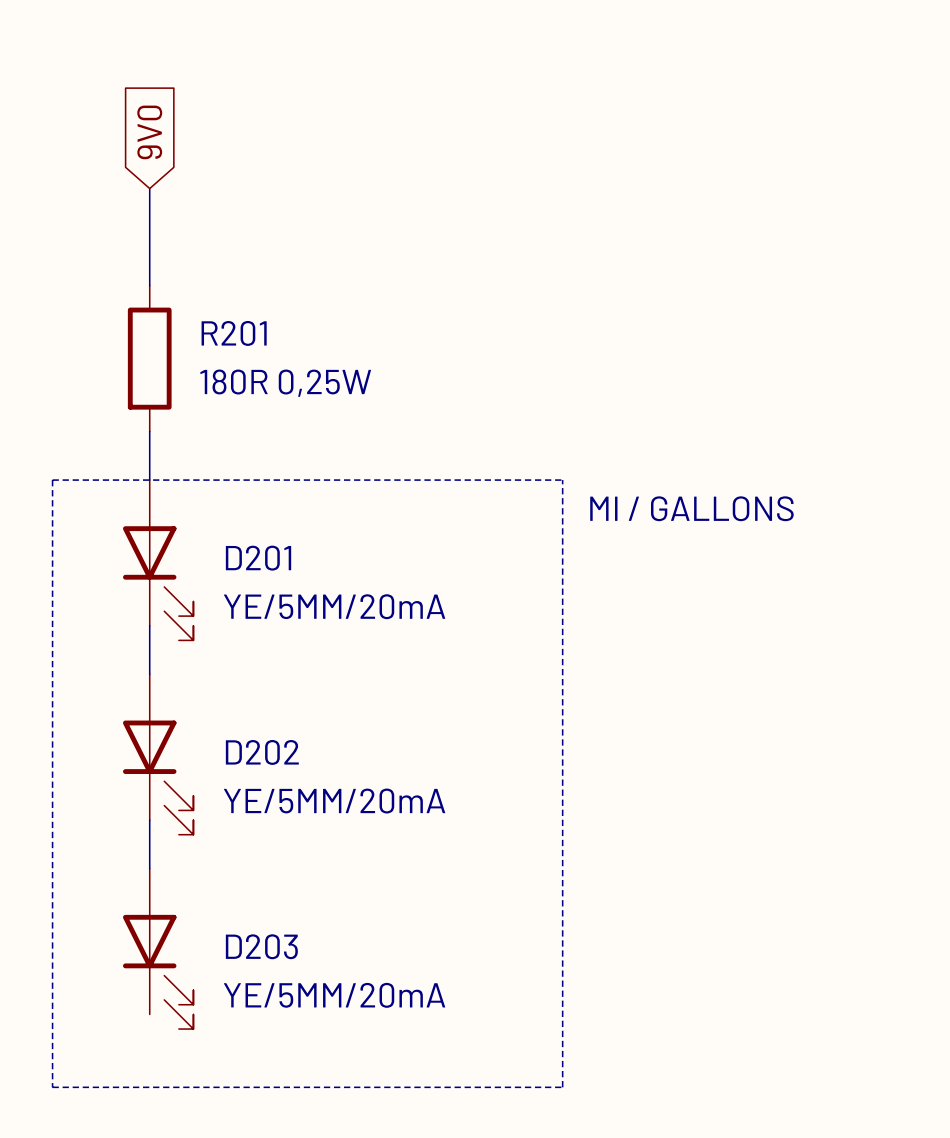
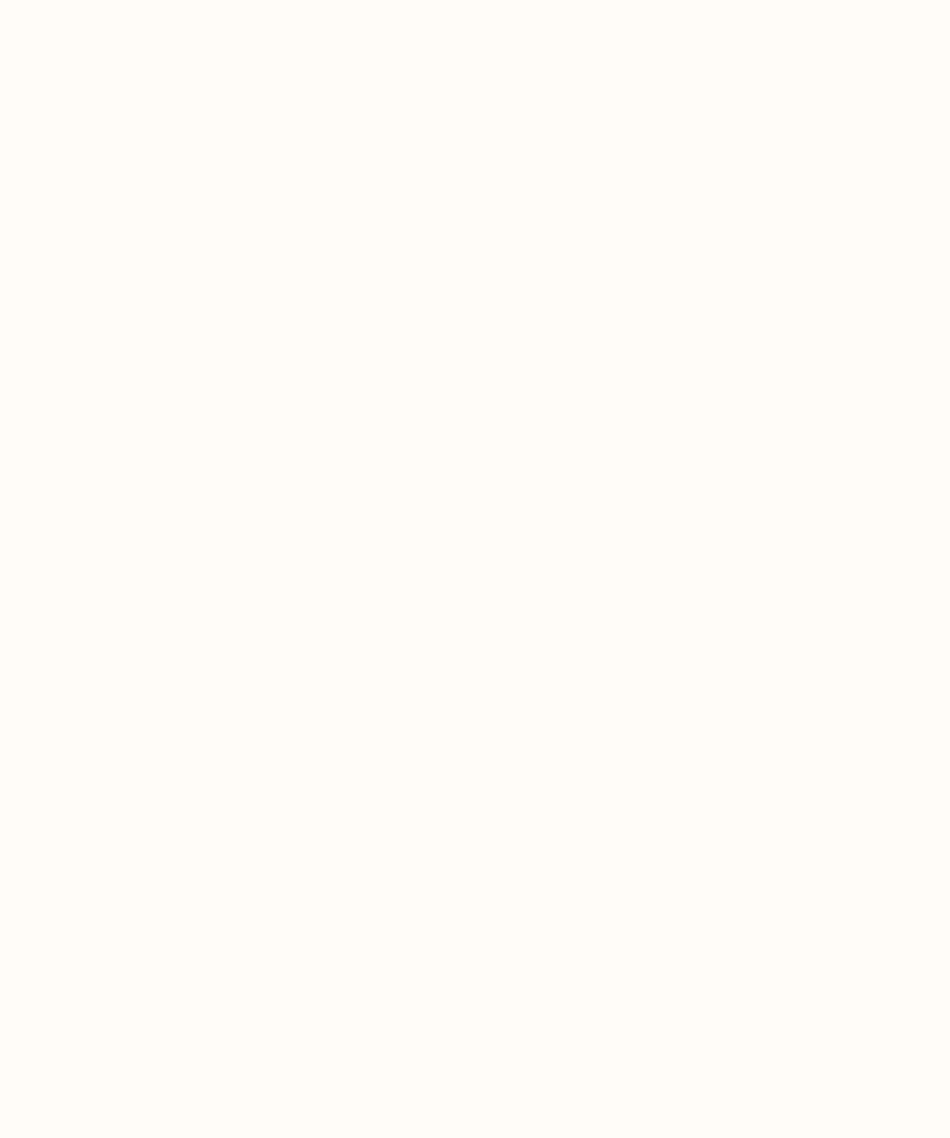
global label: 9V0 (149, 132) -> none
wire: (149, 188) (149, 285) -> none
R201: 180R 0,25W (149, 358) -> none
wire: (149, 431) (149, 480) -> none
line: (52, 480) (562, 480) (562, 1087) (52, 1087) (52, 480) -> none
text: MI / GALLONS (691, 508) -> none
D201: YE/5MM/20mA (158, 560) -> none
wire: (149, 625) (149, 674) -> none
D202: YE/5MM/20mA (158, 754) -> none
wire: (149, 820) (149, 868) -> none
D203: YE/5MM/20mA (158, 948) -> none

